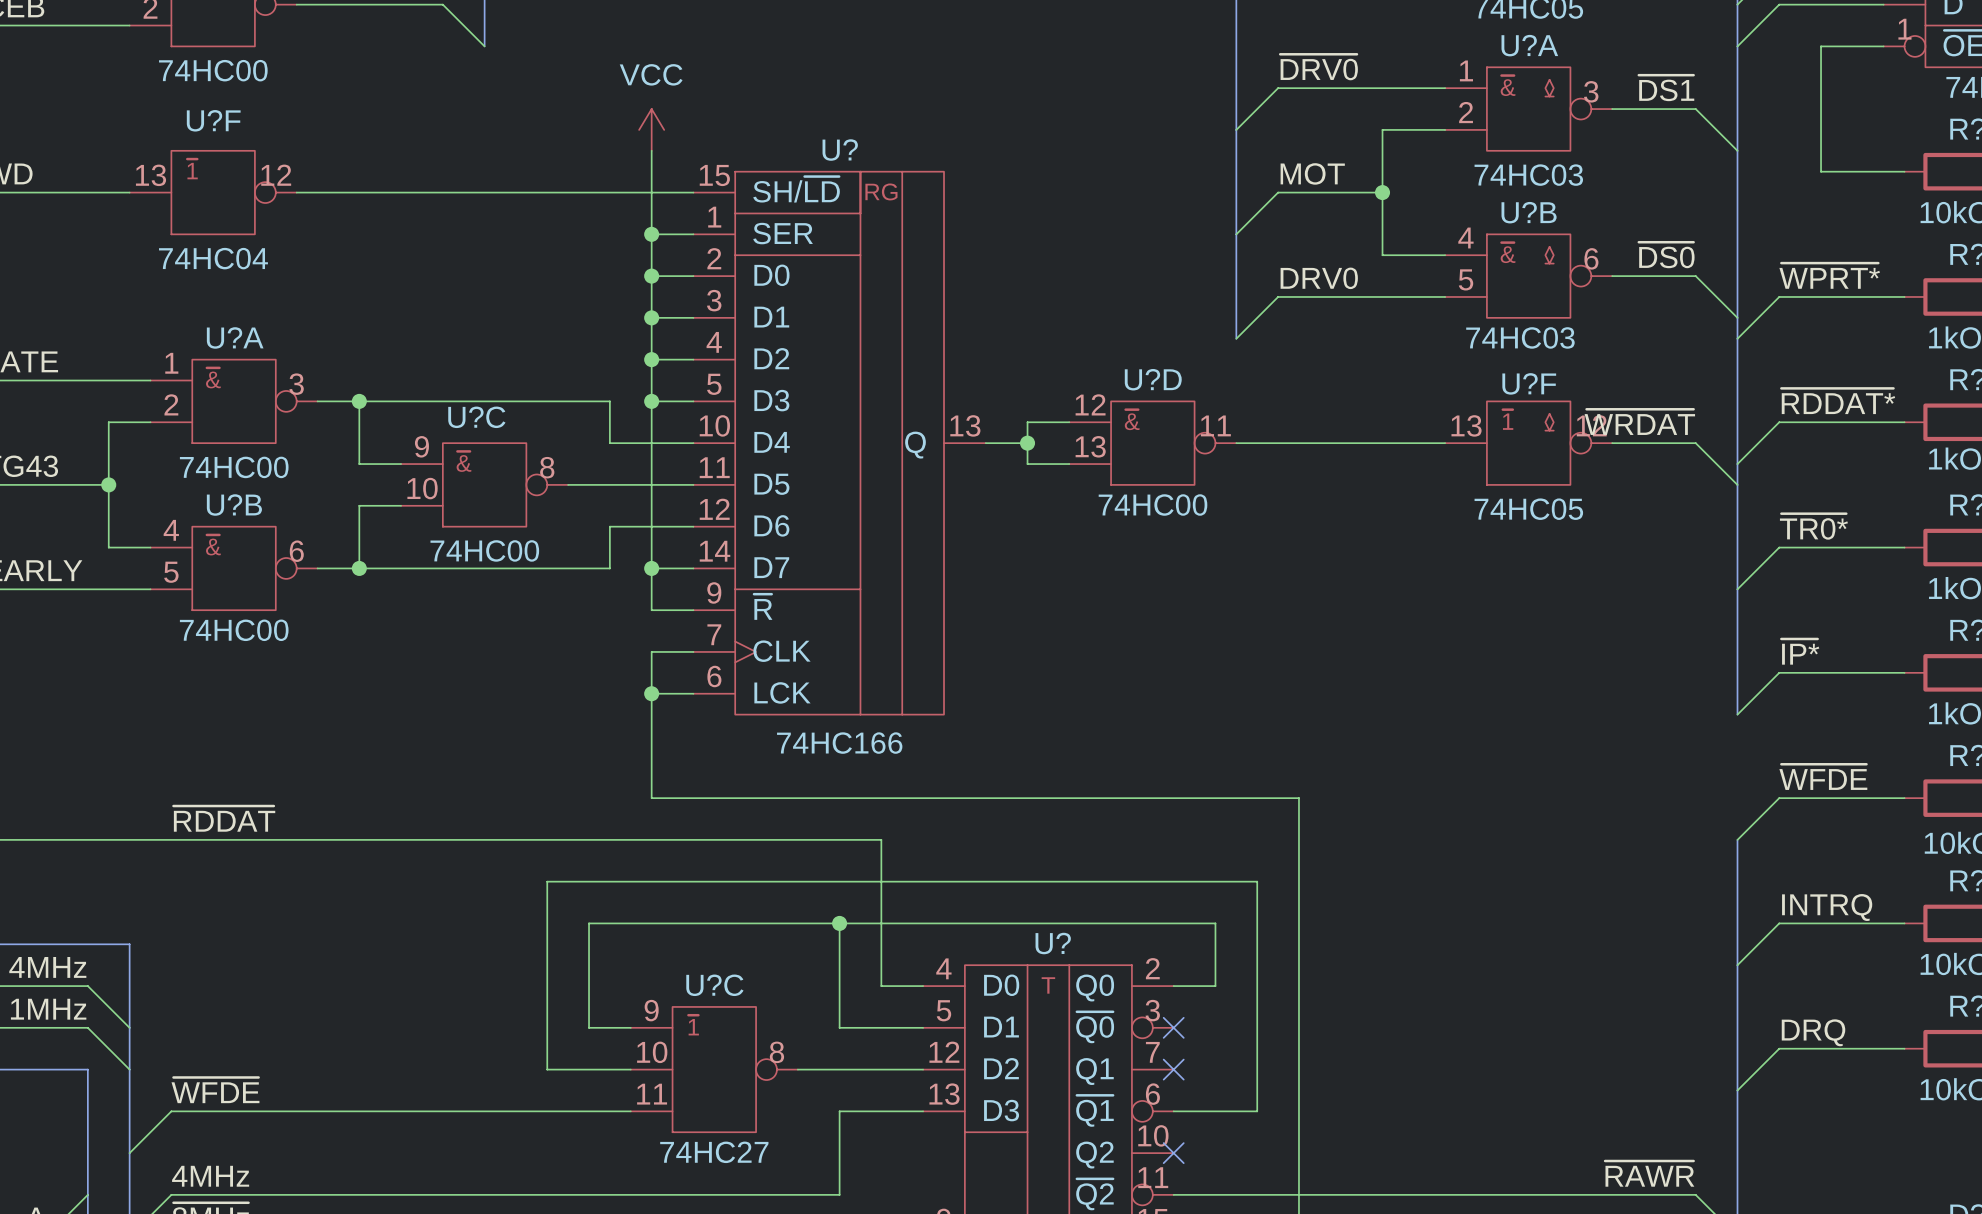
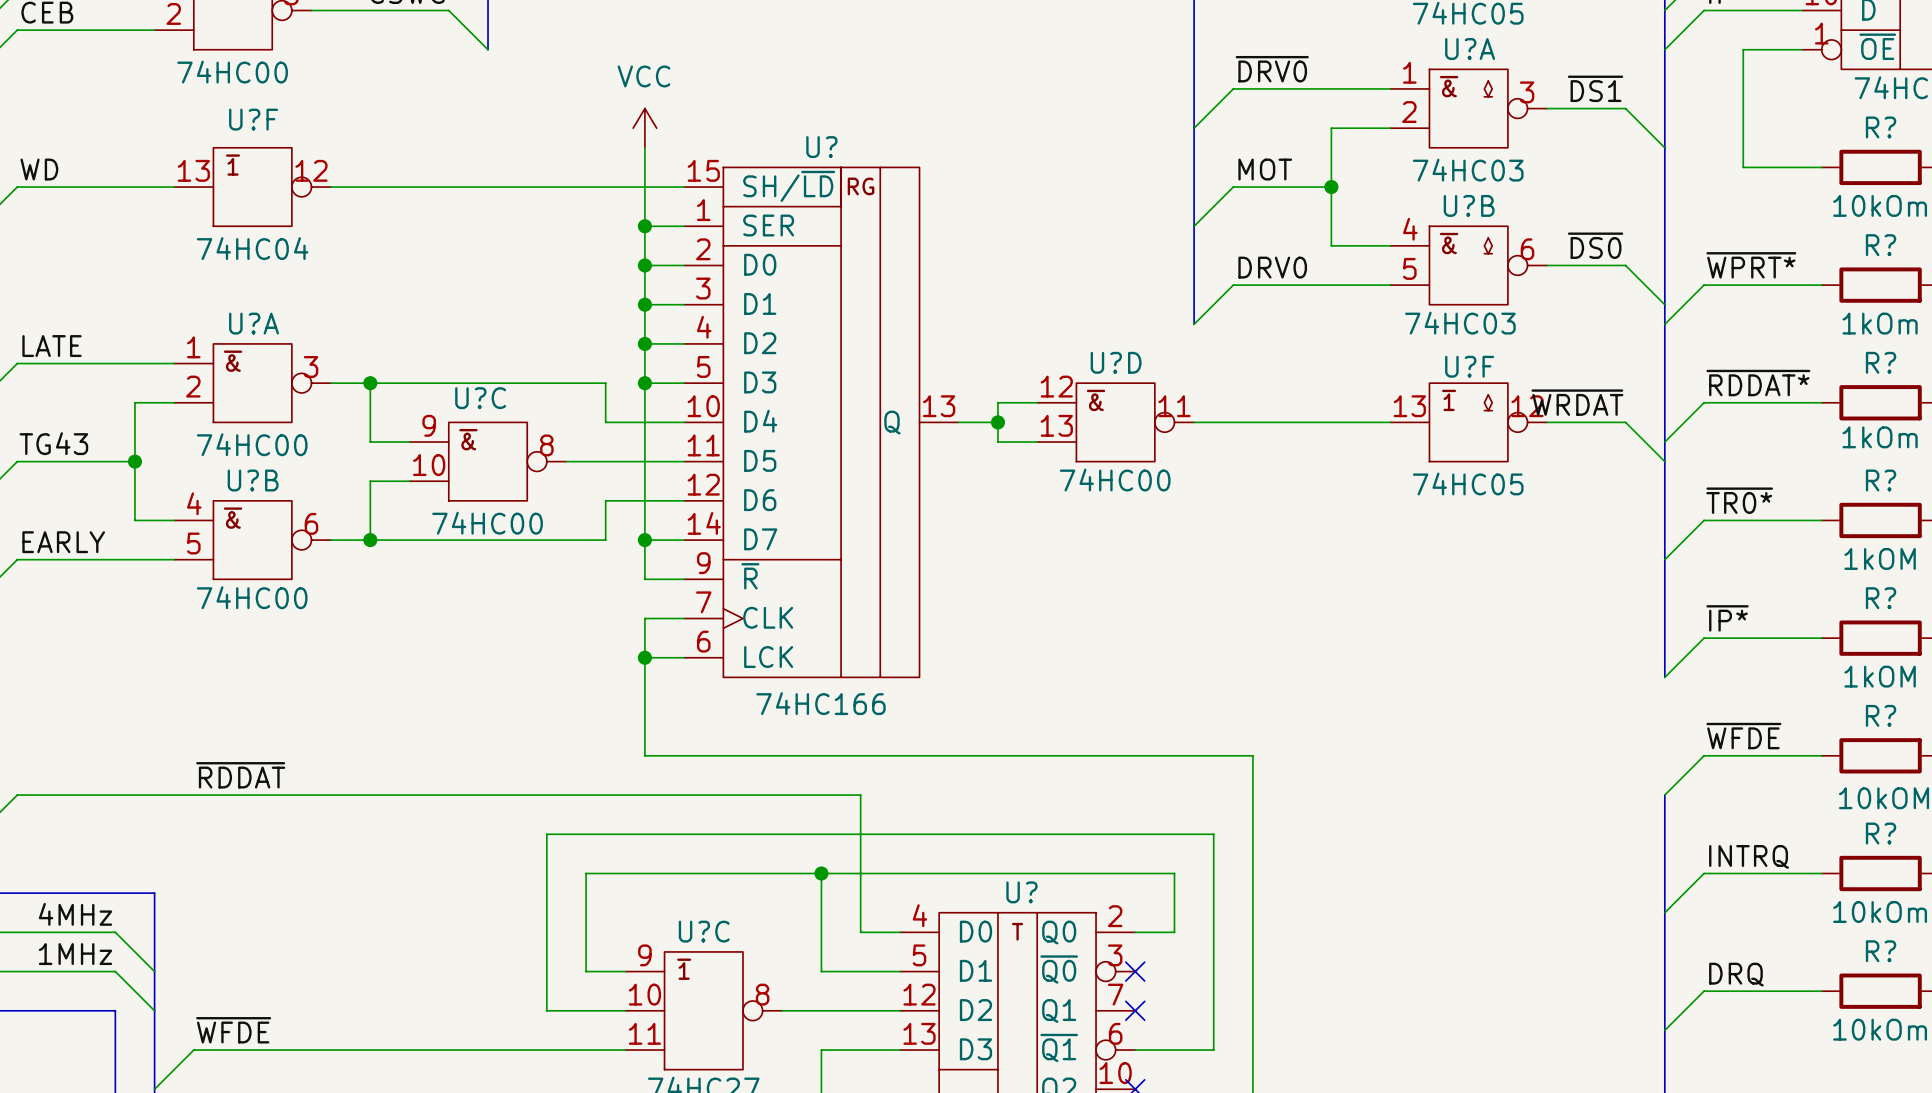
U?F position: (213, 192) -> (252, 187)

